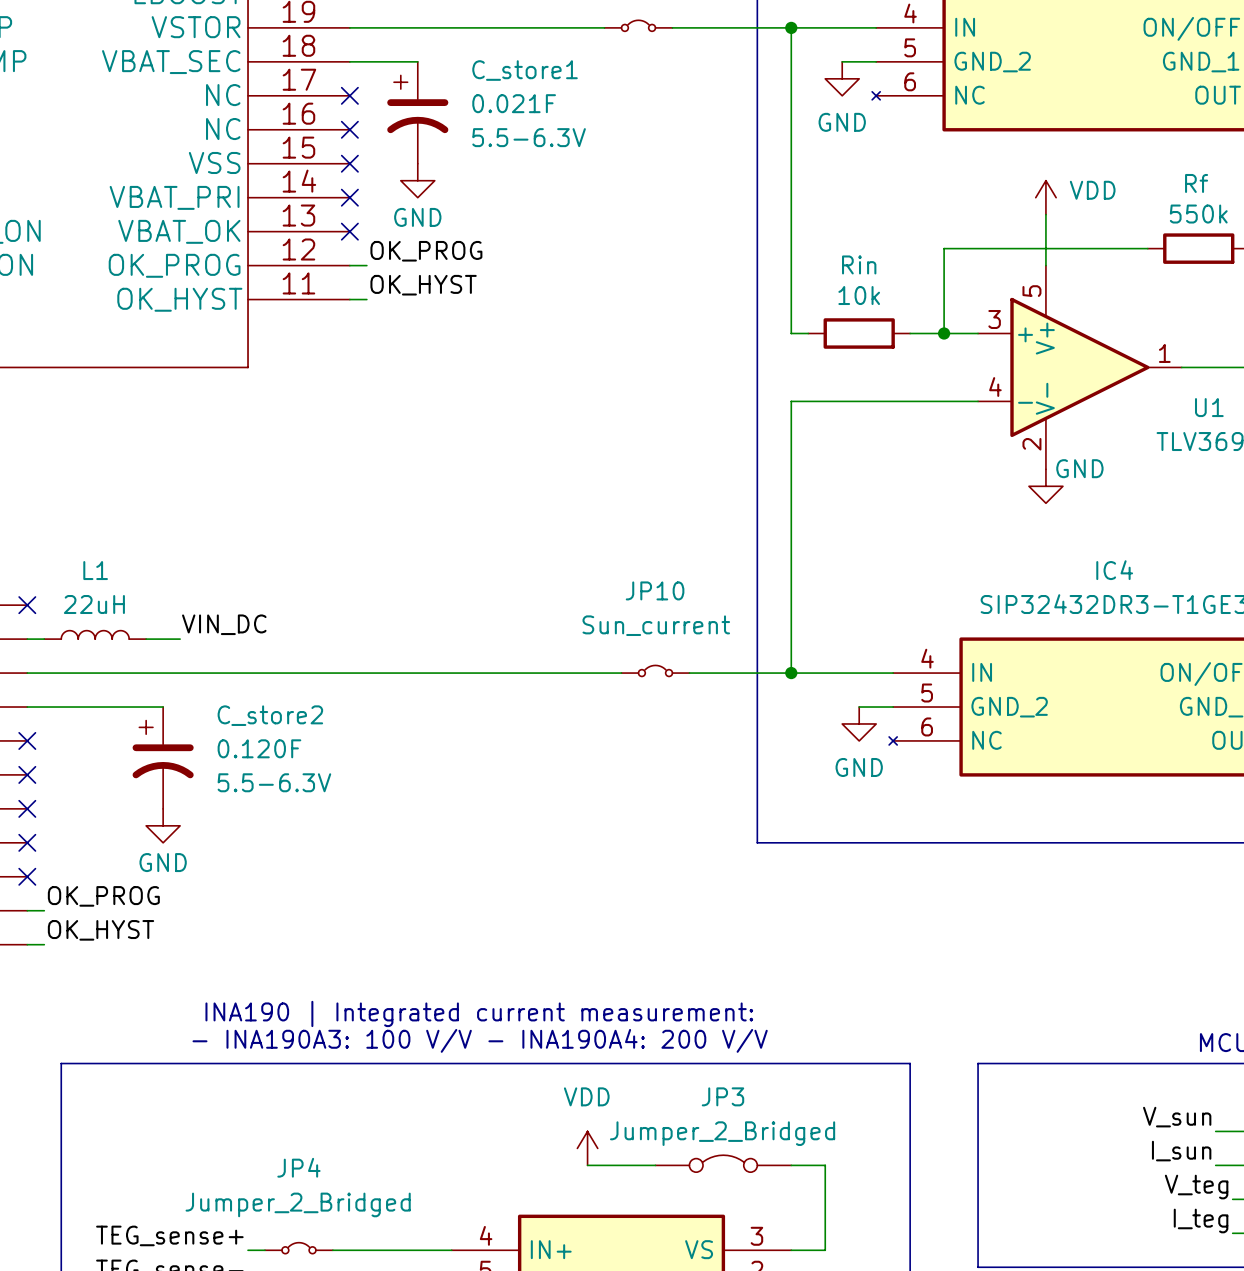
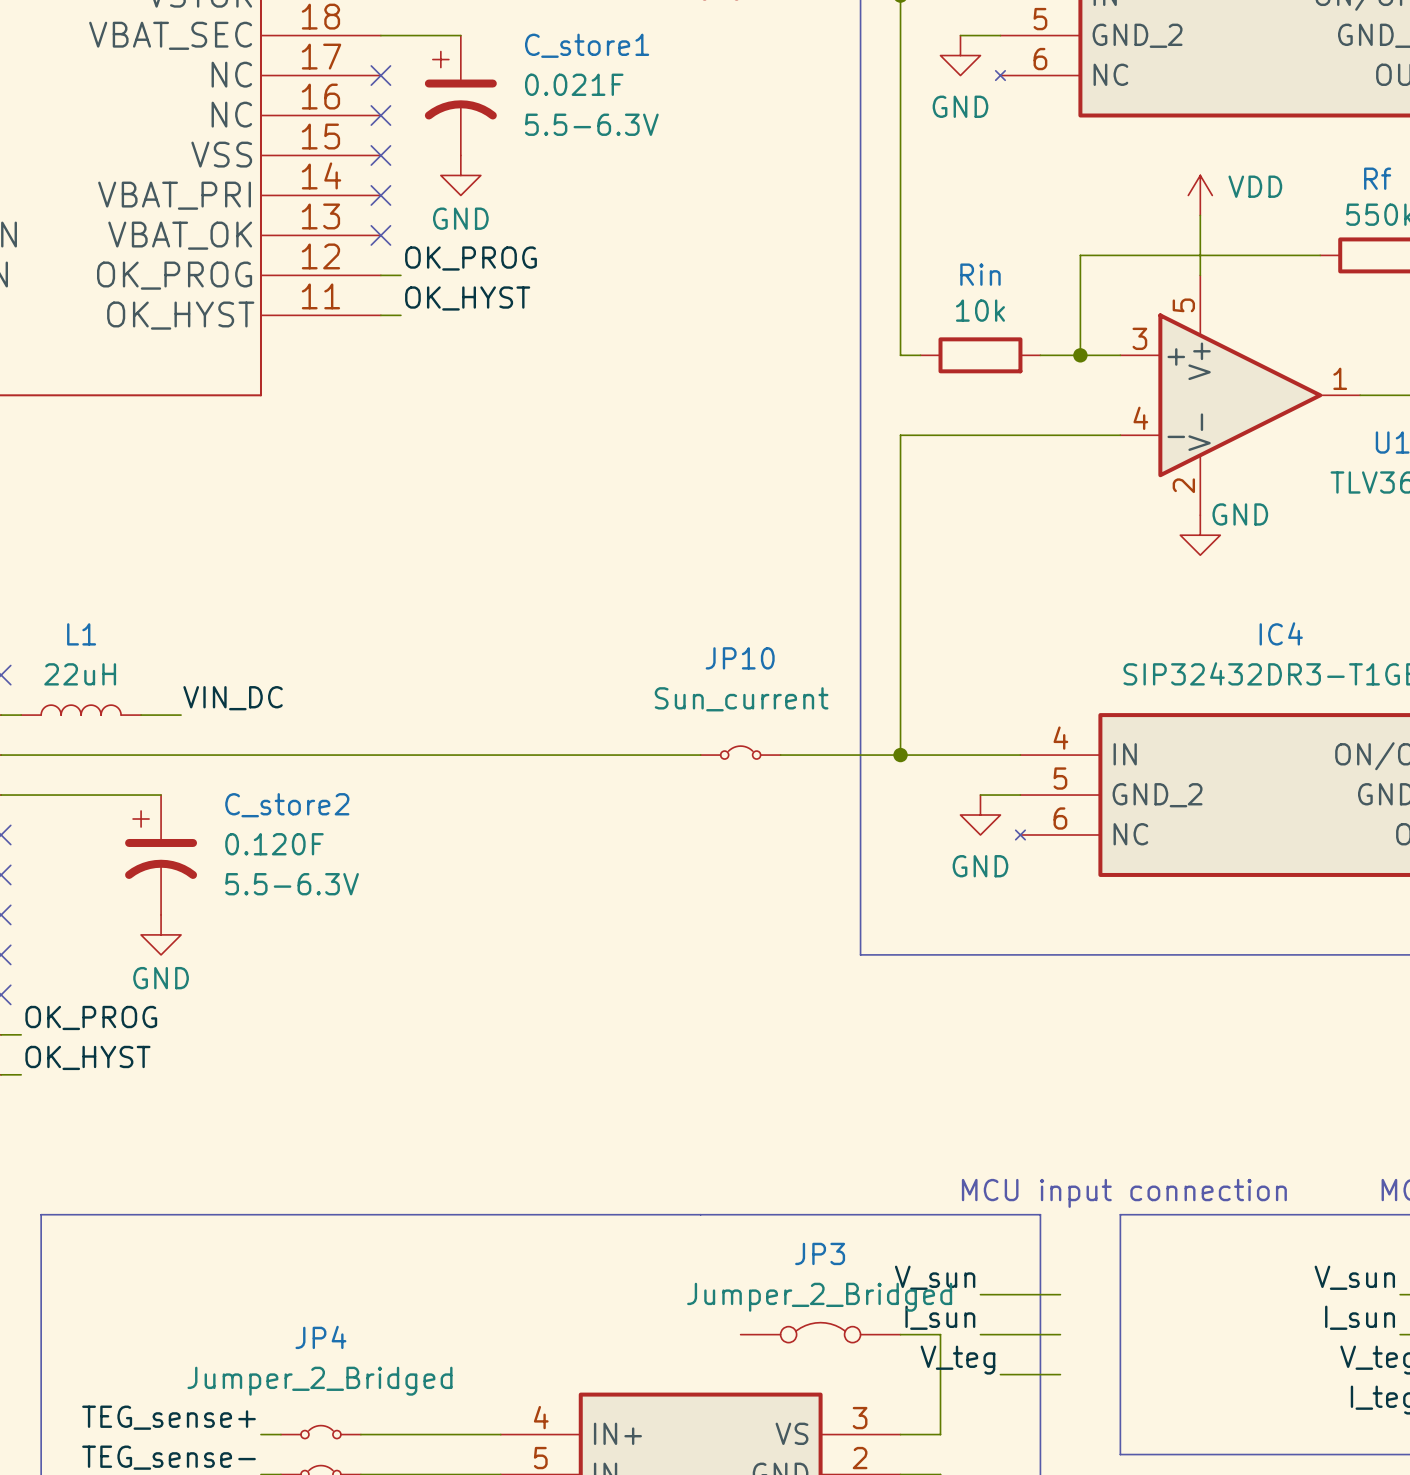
text: INA190 | Integrated current measurement: (479, 1013) -> none
text: - INA190A3: 100 V/V - INA190A4: 200 V/V (480, 1040) -> none
text: none -> MCU input connection (1124, 1193)
label: none -> V_sun (935, 1277)
wire: none -> (980, 1294) (1060, 1294)
power symbol: VDD (587, 1148) -> none
label: none -> I_sun (940, 1317)
wire: (587, 1165) (655, 1165) -> (980, 1334) (1060, 1334)
label: none -> V_teg (957, 1360)
wire: none -> (1000, 1374) (1060, 1374)

